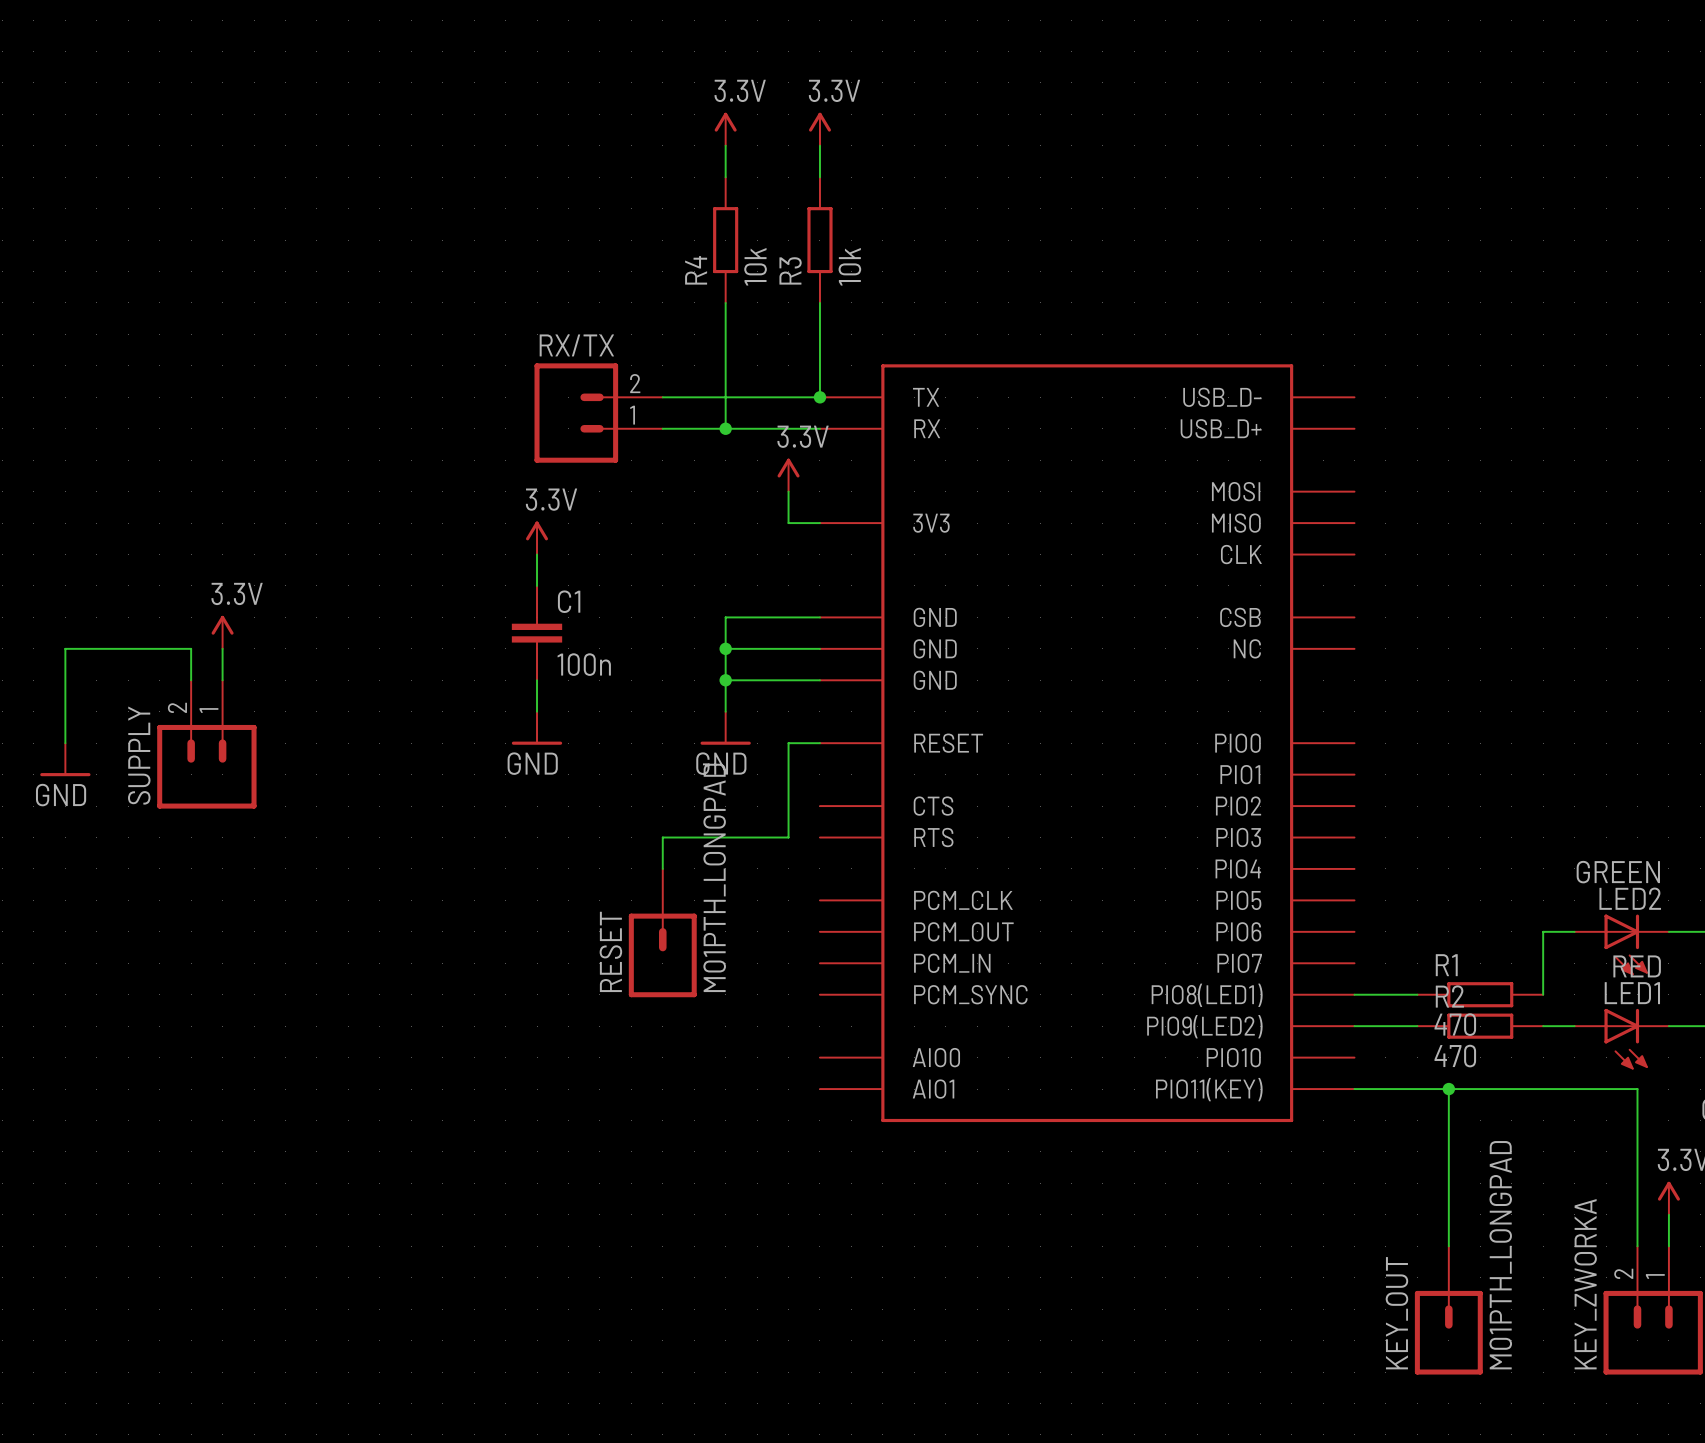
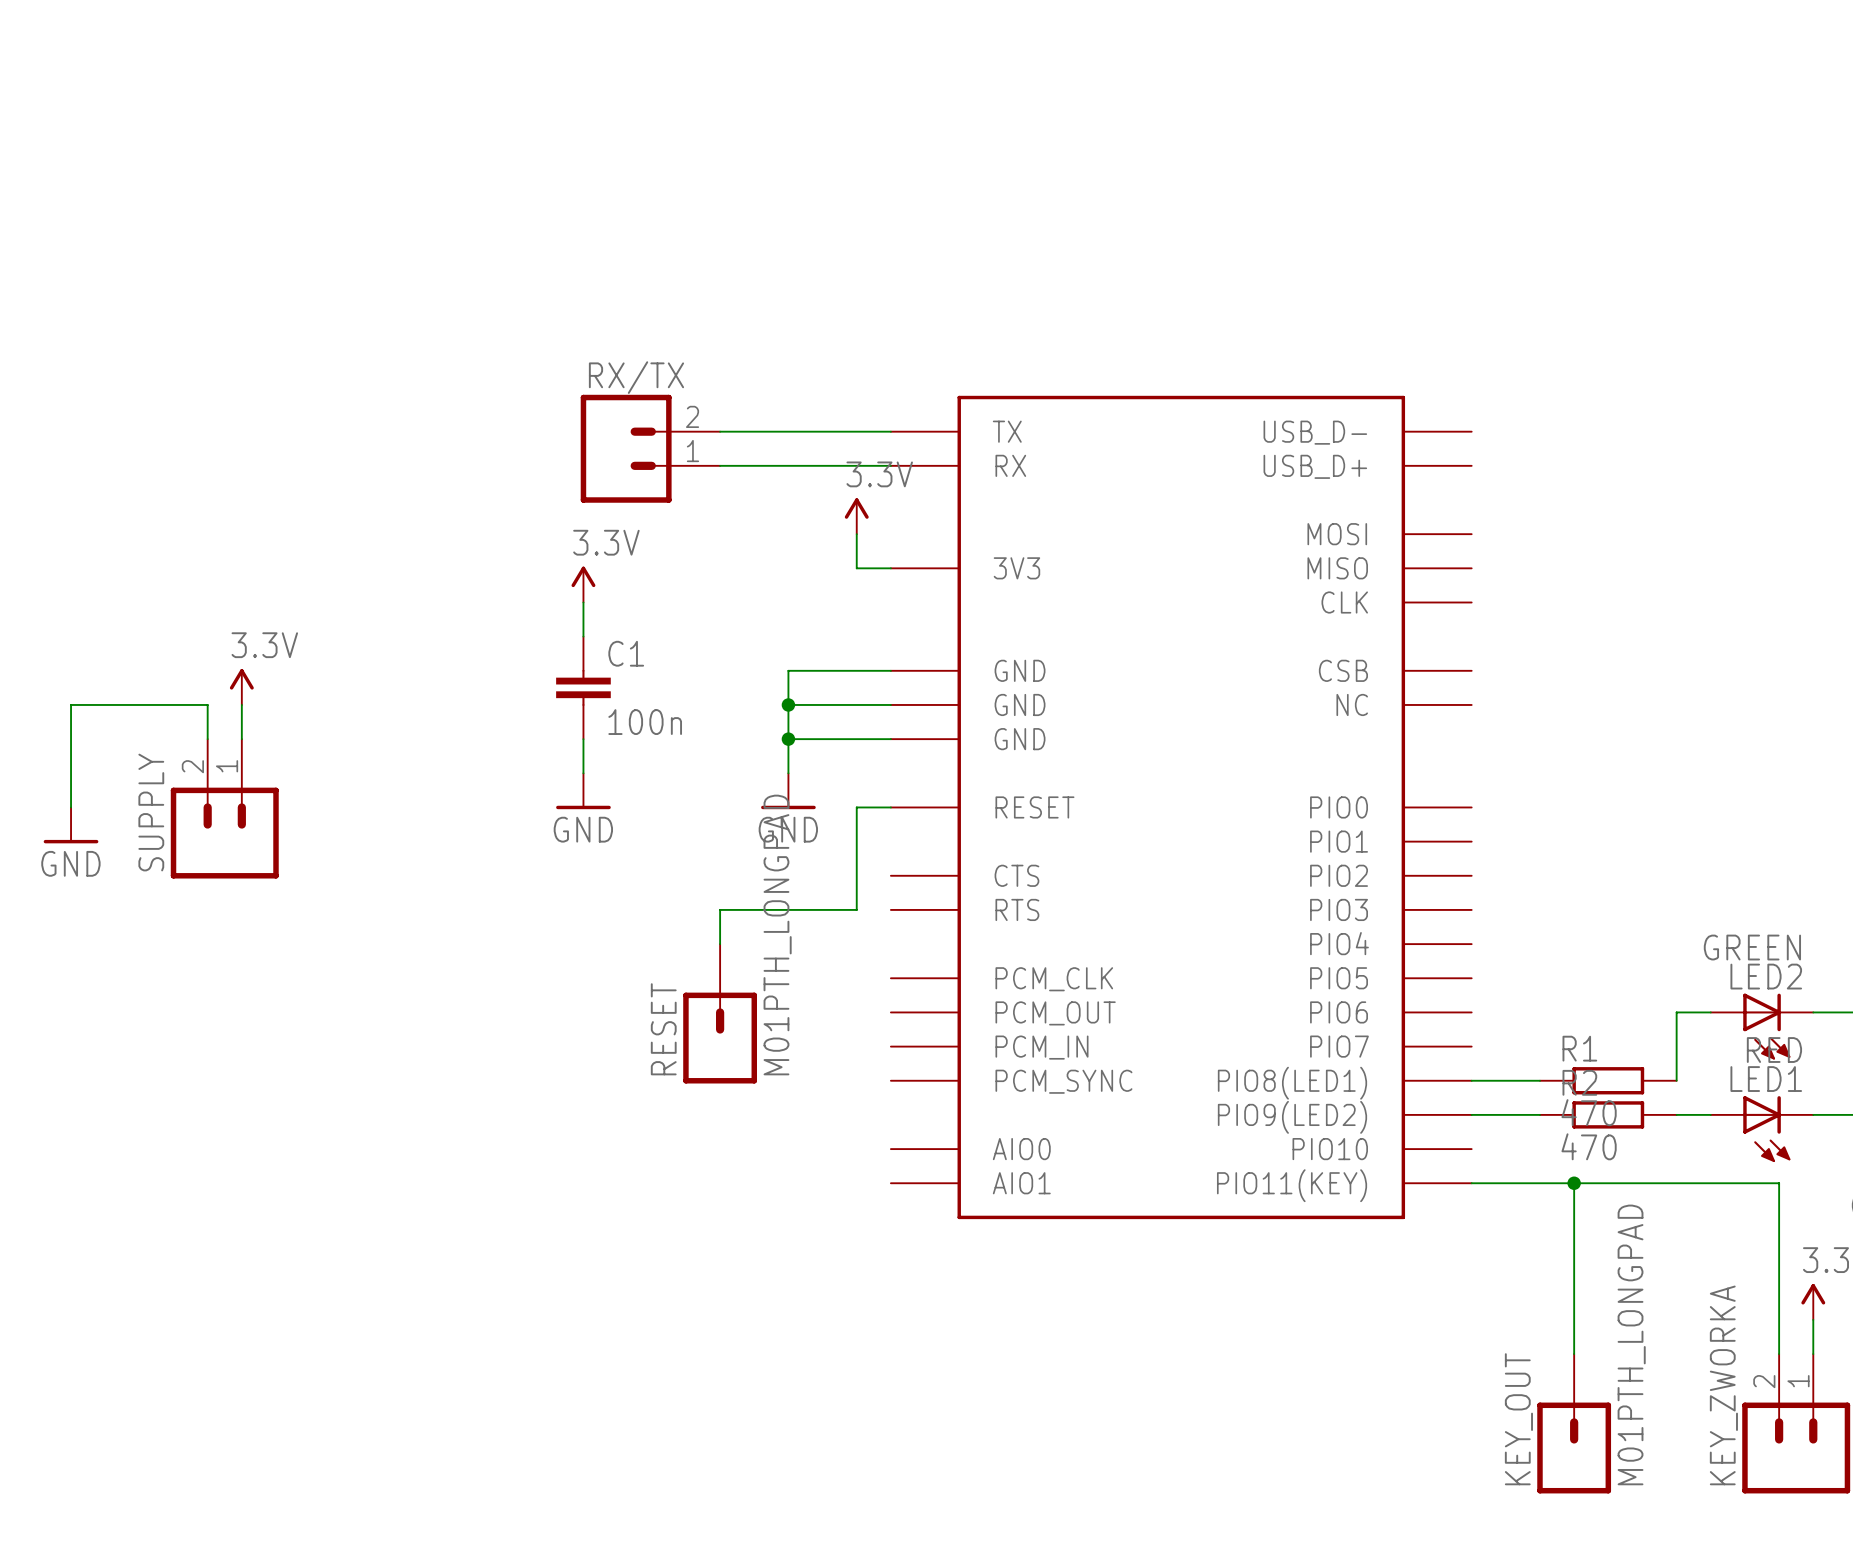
power symbol: 3.3V (725, 129) -> none
power symbol: 3.3V (819, 129) -> none
wire: (725, 145) (725, 177) -> none
wire: (819, 145) (819, 177) -> none
R4: 10k (725, 240) -> none
R3: 10k (819, 240) -> none
wire: (725, 302) (725, 428) -> none
wire: (819, 302) (819, 397) -> none
junction: (819, 397) -> none
junction: (725, 428) -> none

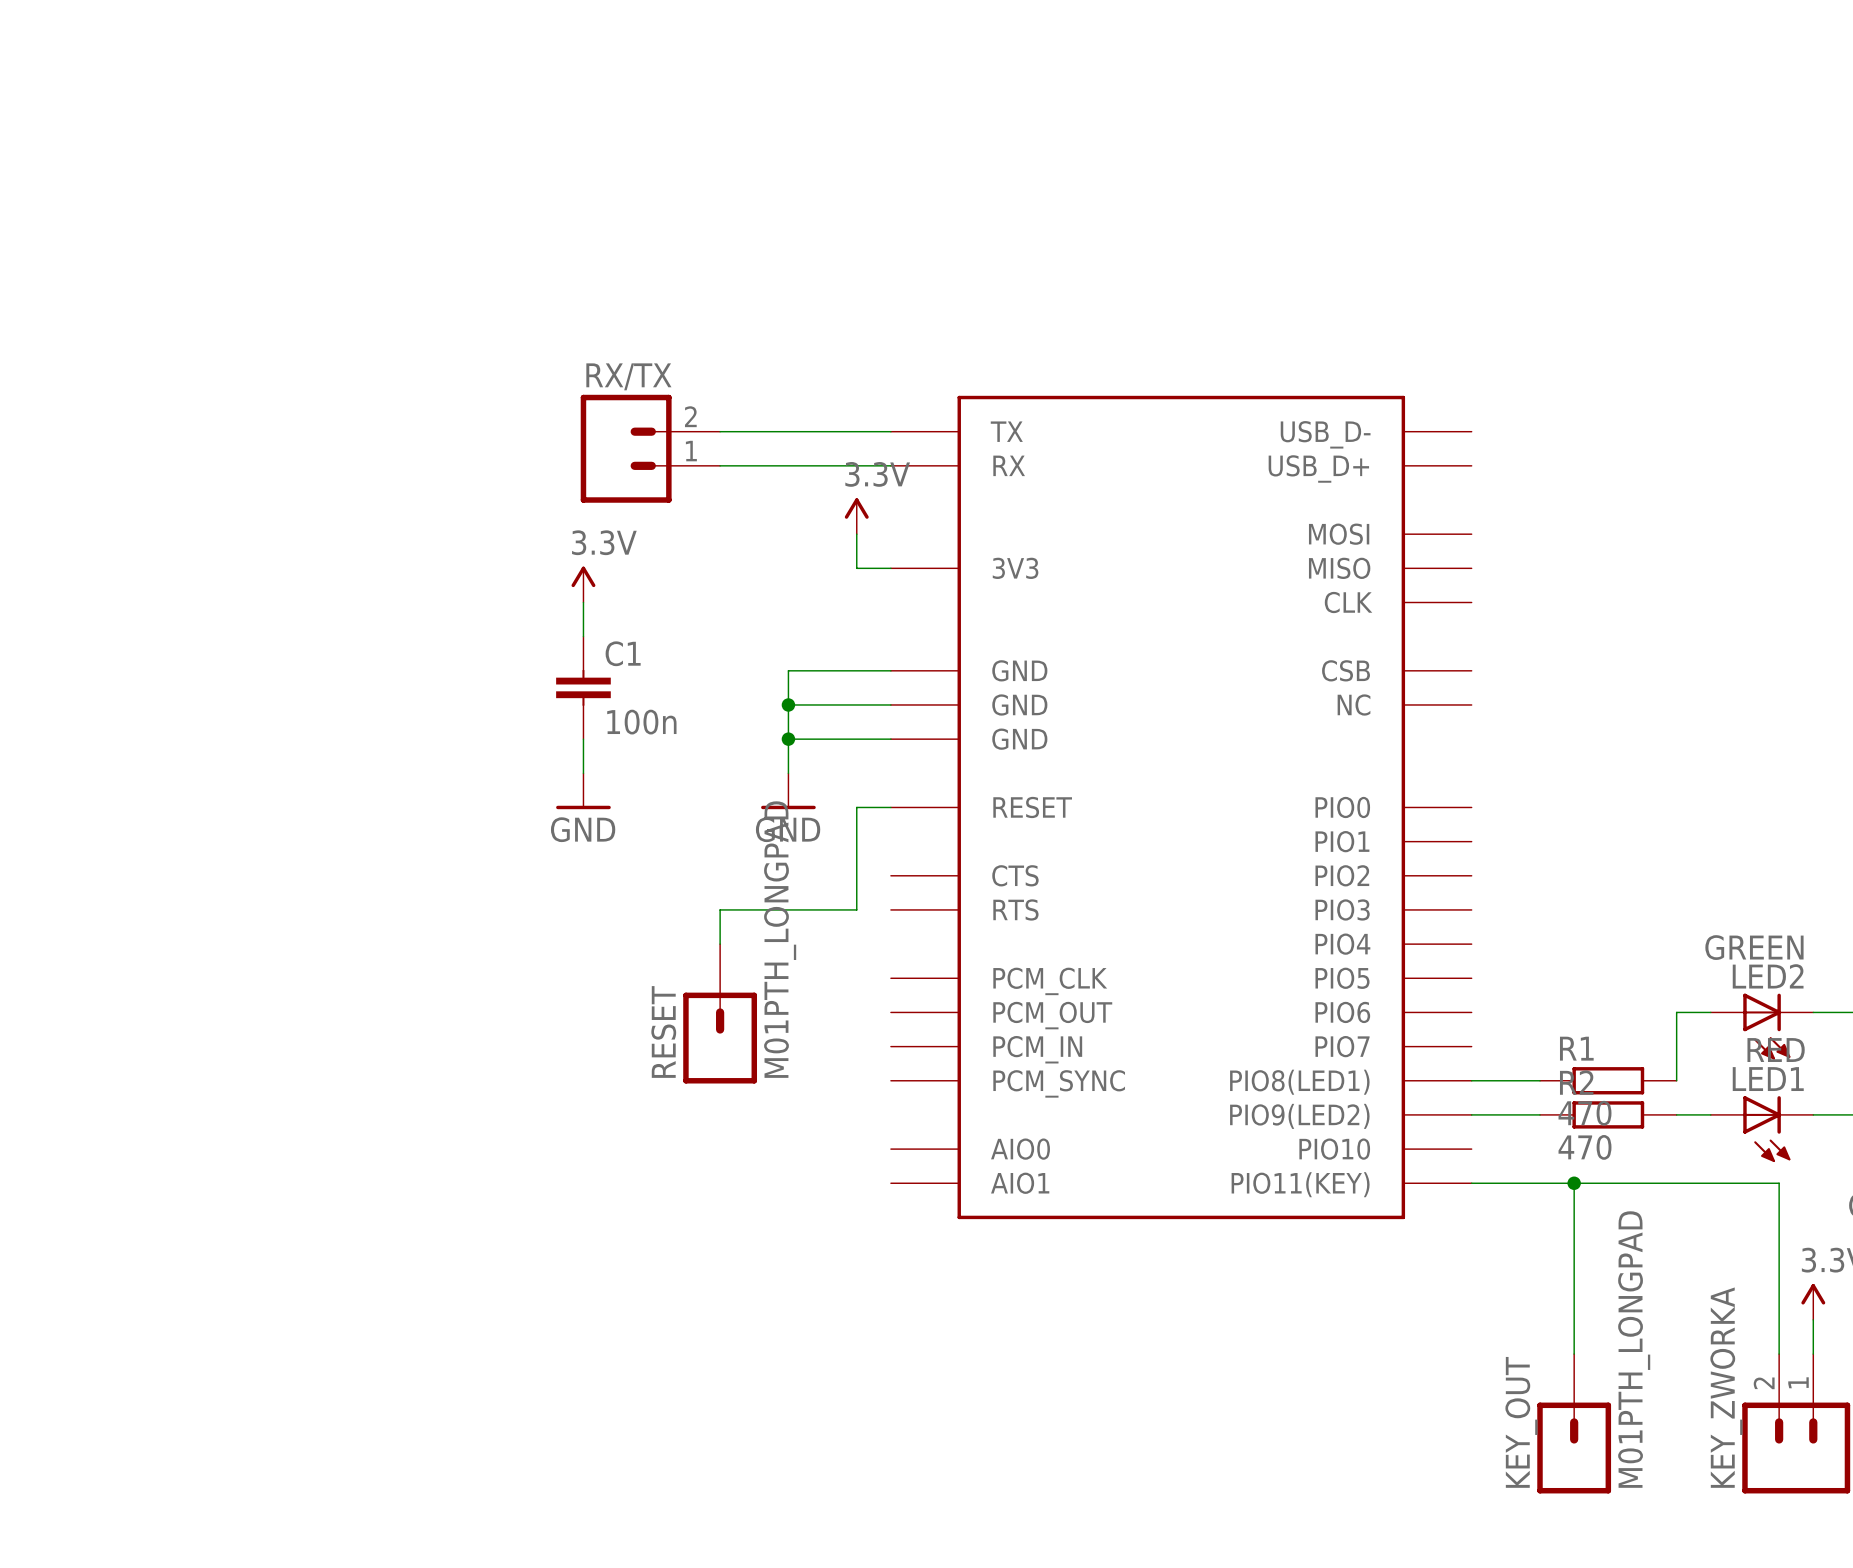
power symbol: 3.3V (241, 687) -> none
wire: (241, 704) (241, 739) -> none
wire: (207, 739) (207, 704) (71, 704) (71, 807) -> none
SUPPLY: (224, 808) -> none
power symbol: GND (71, 825) -> none

